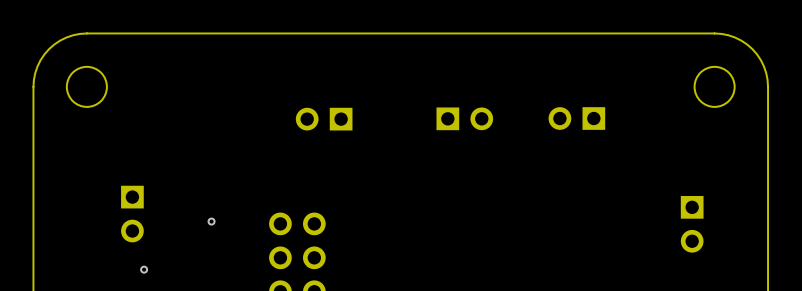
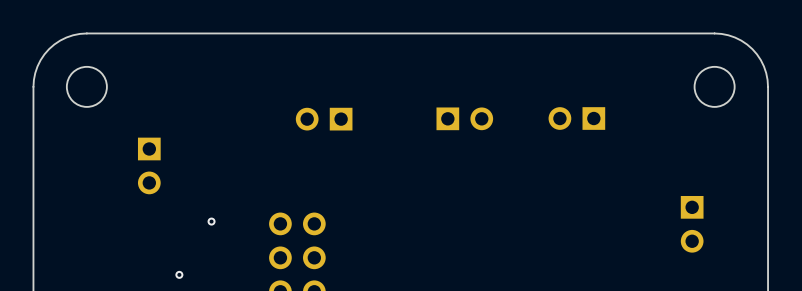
part position: (132, 214) -> (149, 165)
via position: (144, 269) -> (179, 274)

